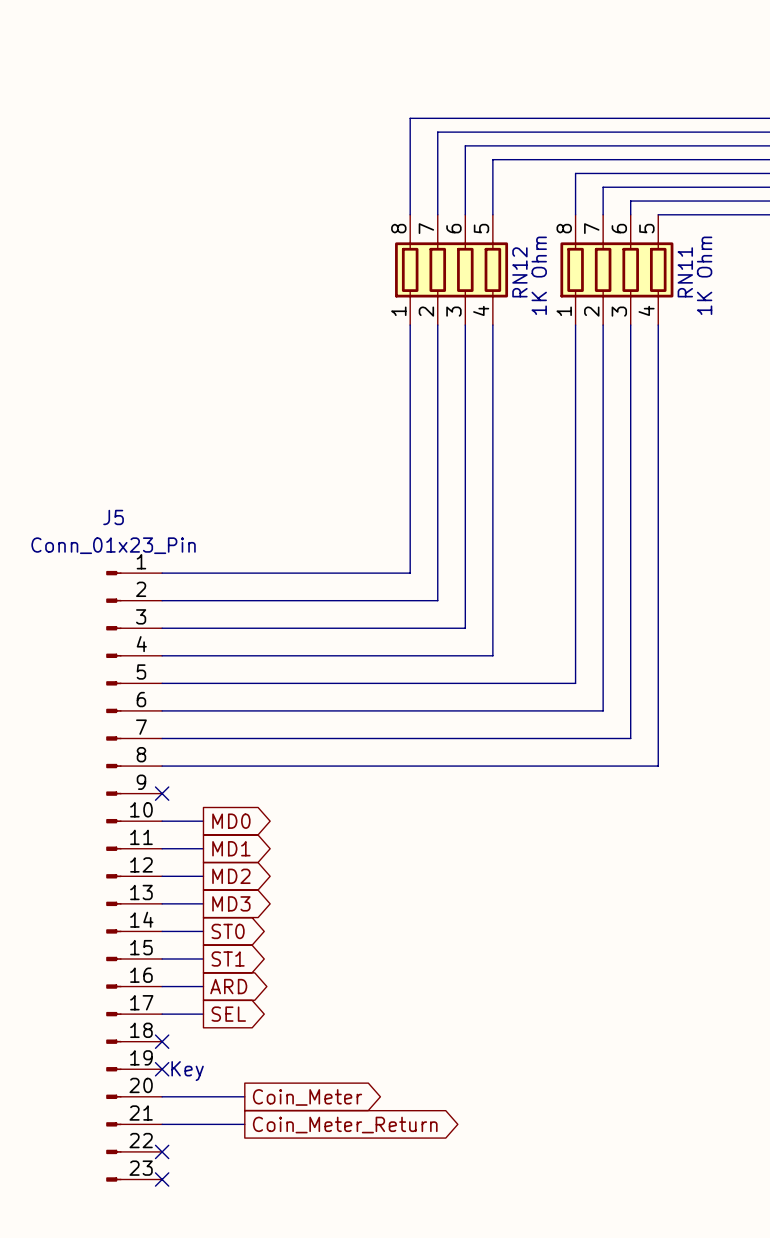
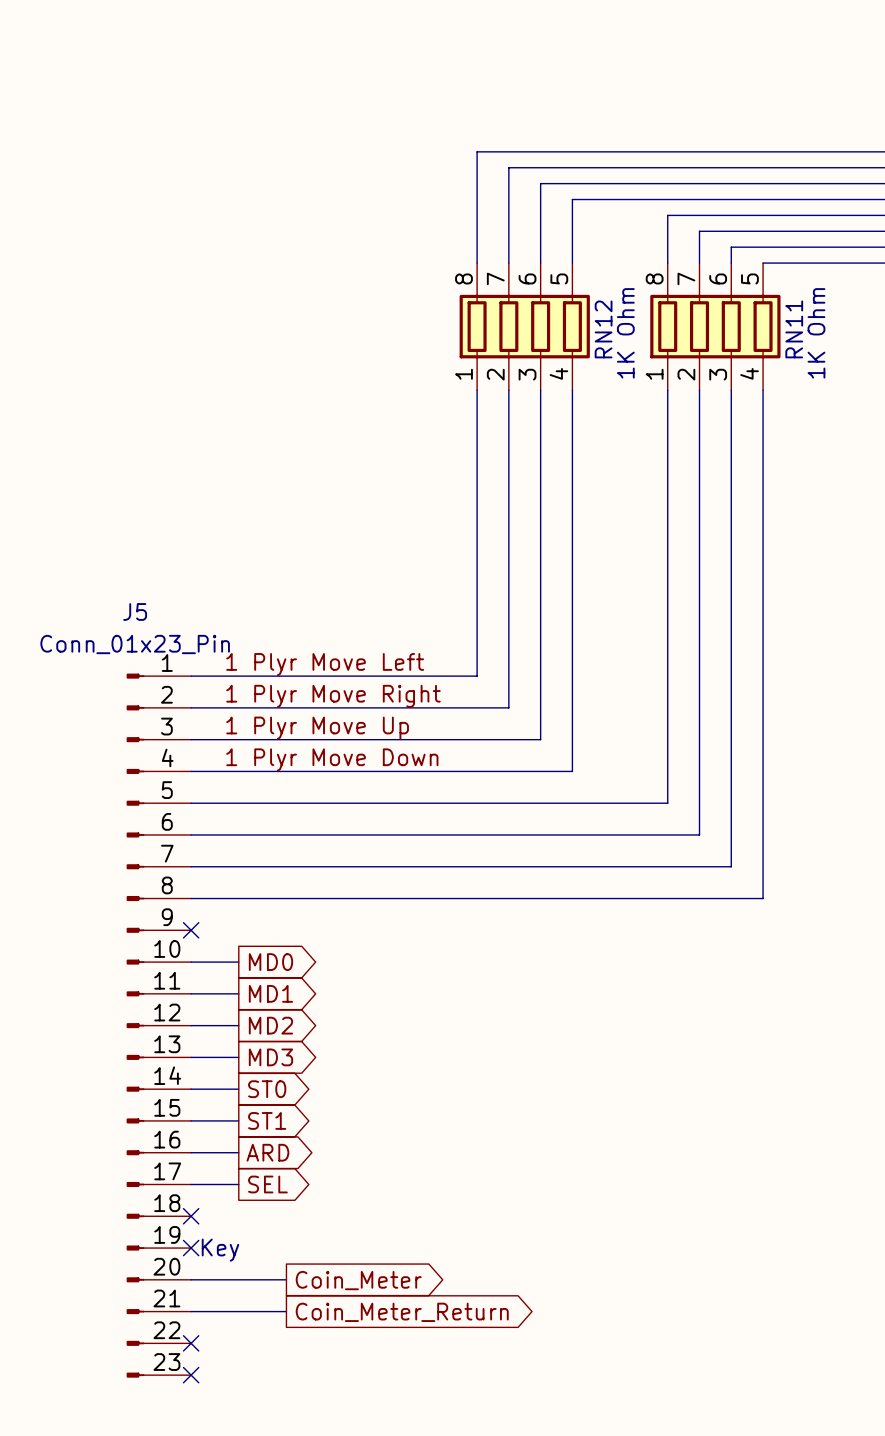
label: none -> 1 Plyr Move Left (325, 664)
label: none -> 1 Plyr Move Right (333, 696)
label: none -> 1 Plyr Move Up (317, 728)
label: none -> 1 Plyr Move Down (332, 759)

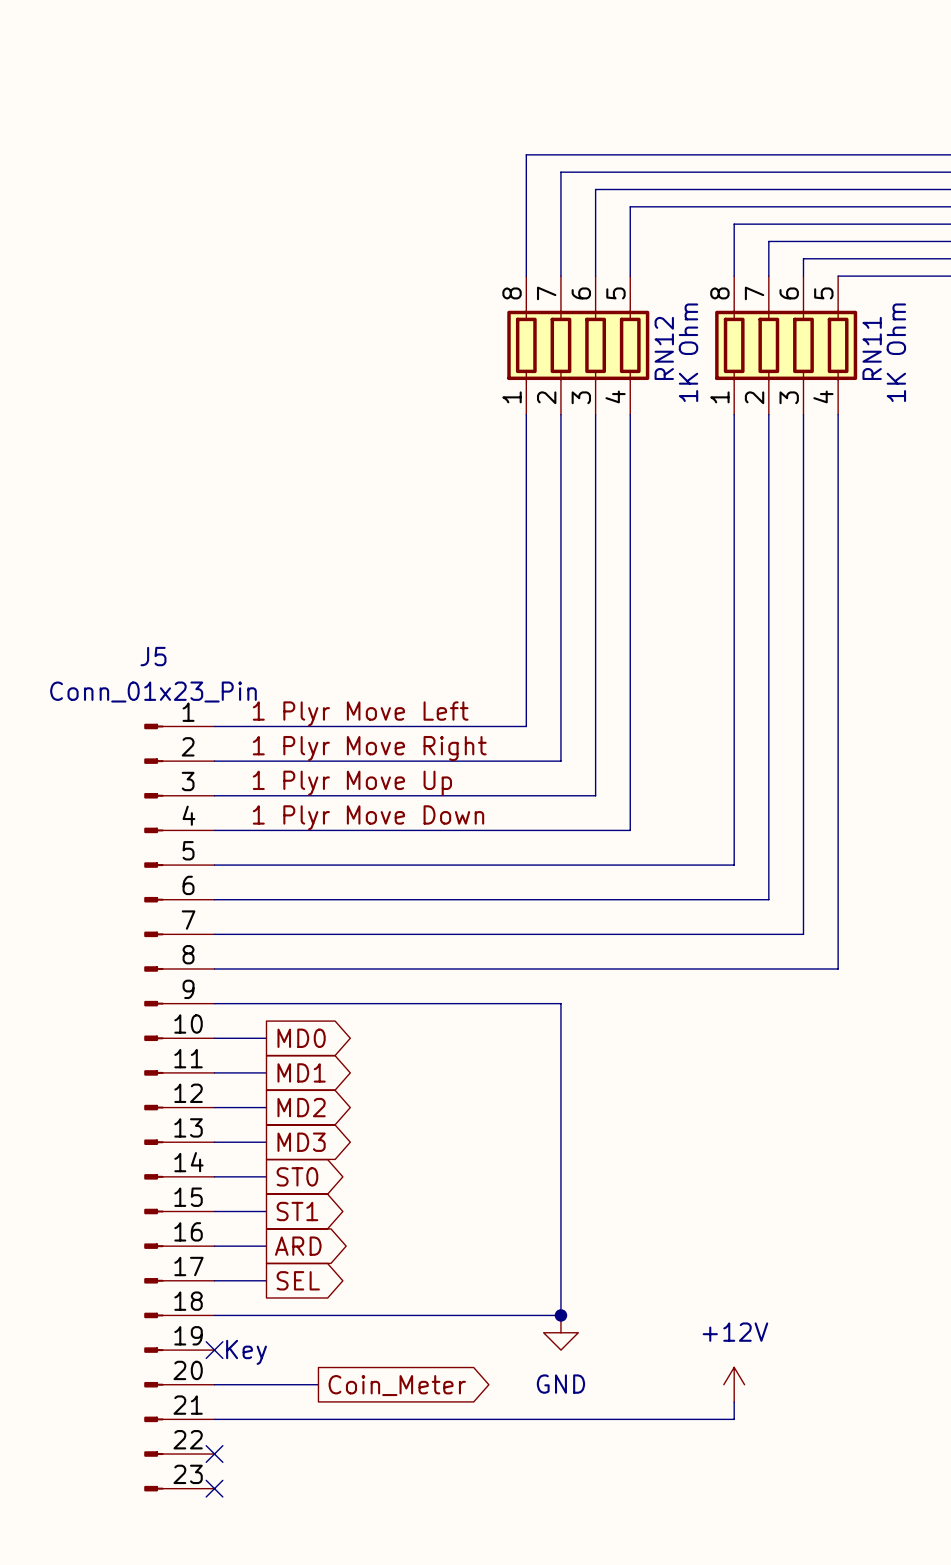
wire: none -> (214, 1003) (560, 1003) (560, 1315) (214, 1315)
no-connect mark: (191, 930) -> none
no-connect mark: (191, 1216) -> none
junction: none -> (560, 1315)
power symbol: none -> GND (560, 1332)
power symbol: none -> +12V (734, 1384)
wire: none -> (734, 1402) (734, 1419) (318, 1419)
global label: Coin_Meter_Return (402, 1312) -> none

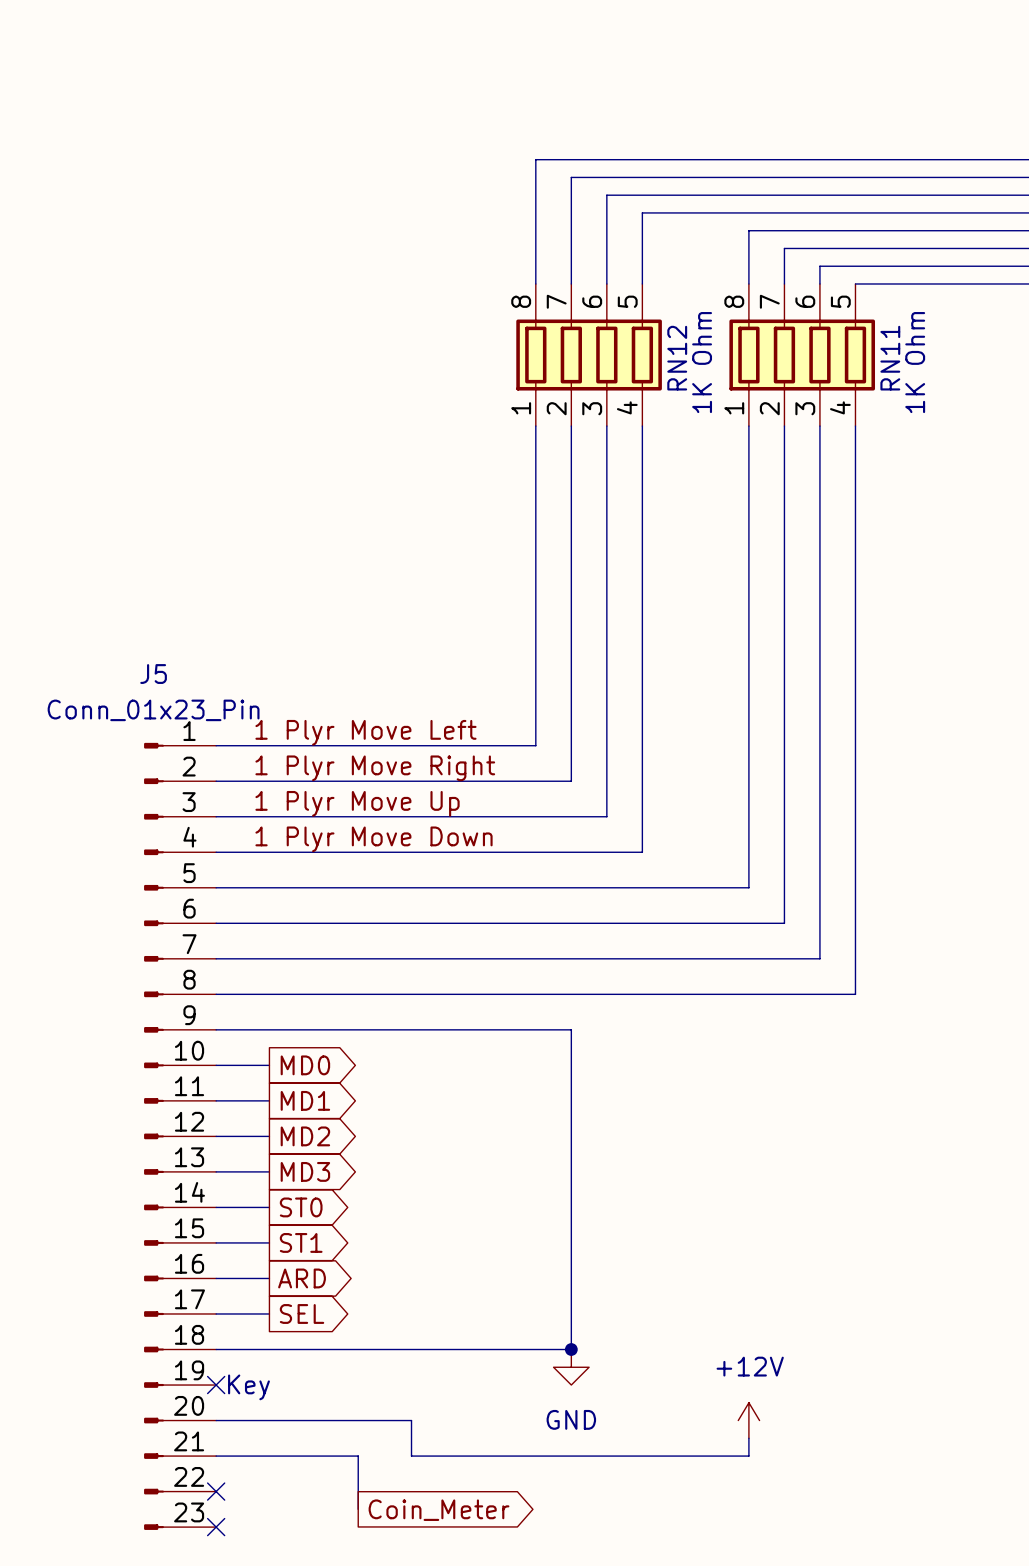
global label position: Coin_Meter (397, 1385) -> Coin_Meter (439, 1510)
wire: (353, 1419) (405, 1419) -> (322, 1420) (411, 1420) (411, 1456)
wire: none -> (358, 1456) (358, 1509)

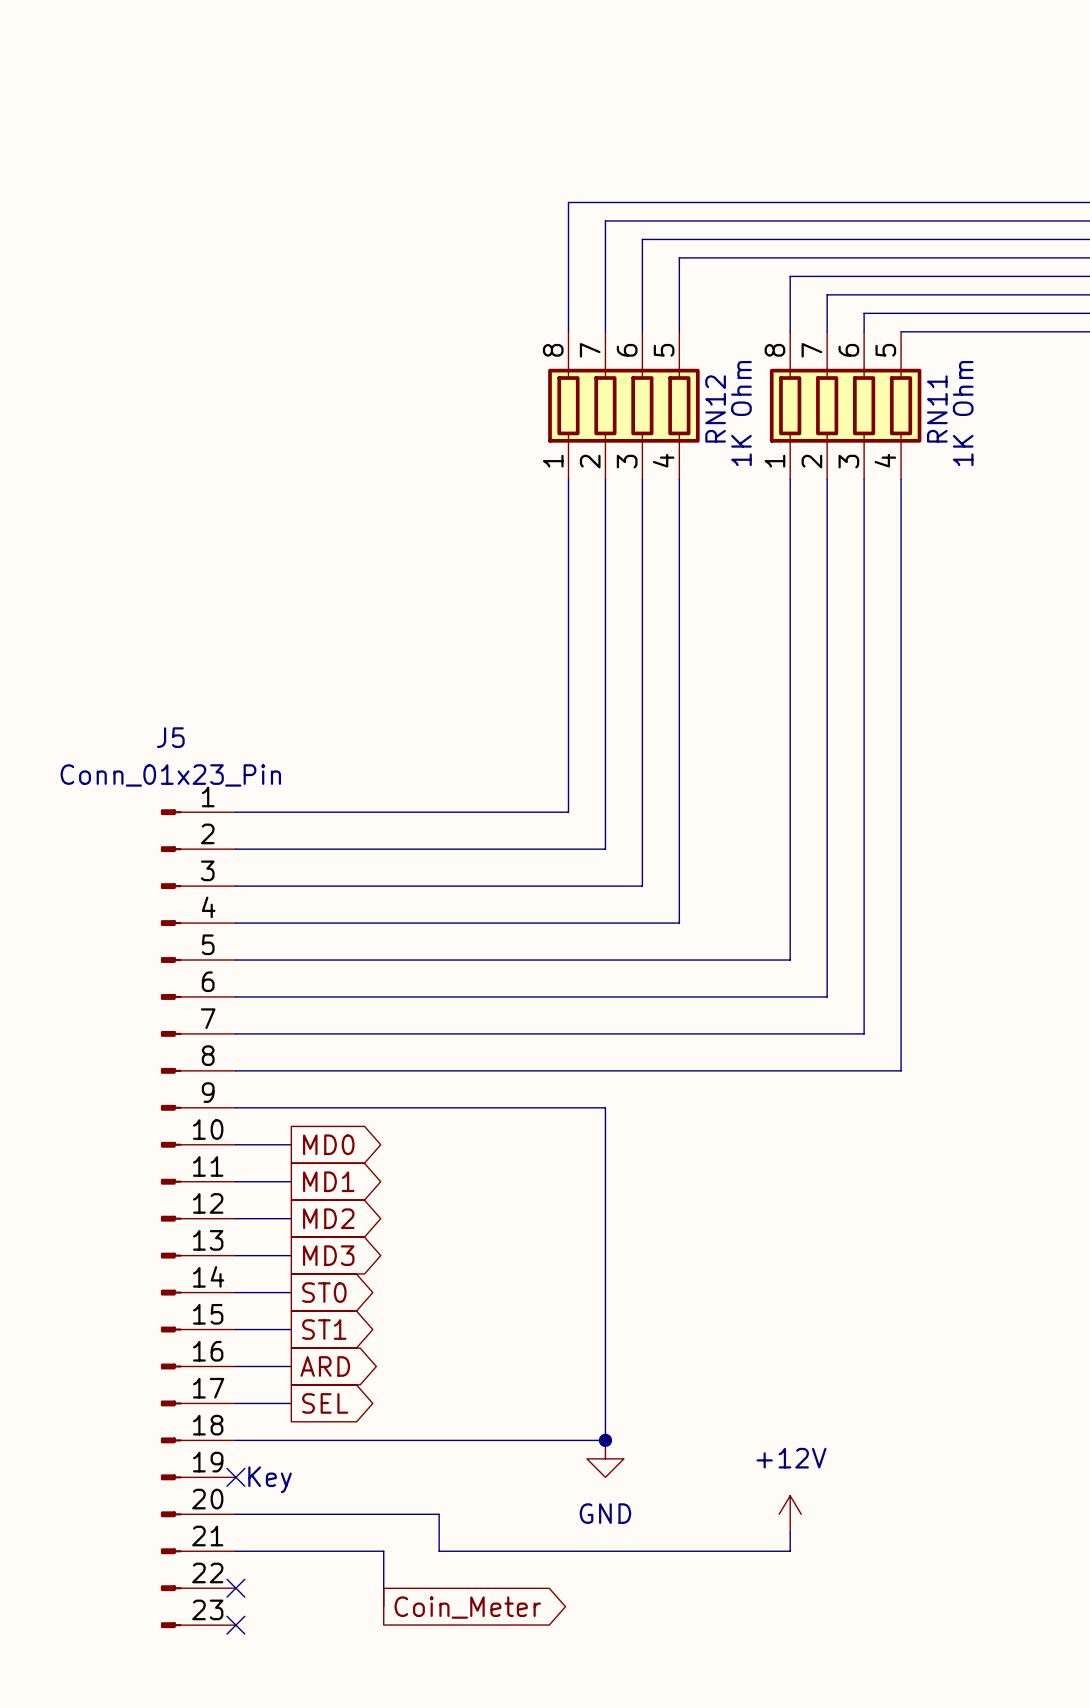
label: 1 Plyr Move Left (365, 732) -> none
label: 1 Plyr Move Right (375, 768) -> none
label: 1 Plyr Move Up (357, 803) -> none
label: 1 Plyr Move Down (374, 839) -> none

